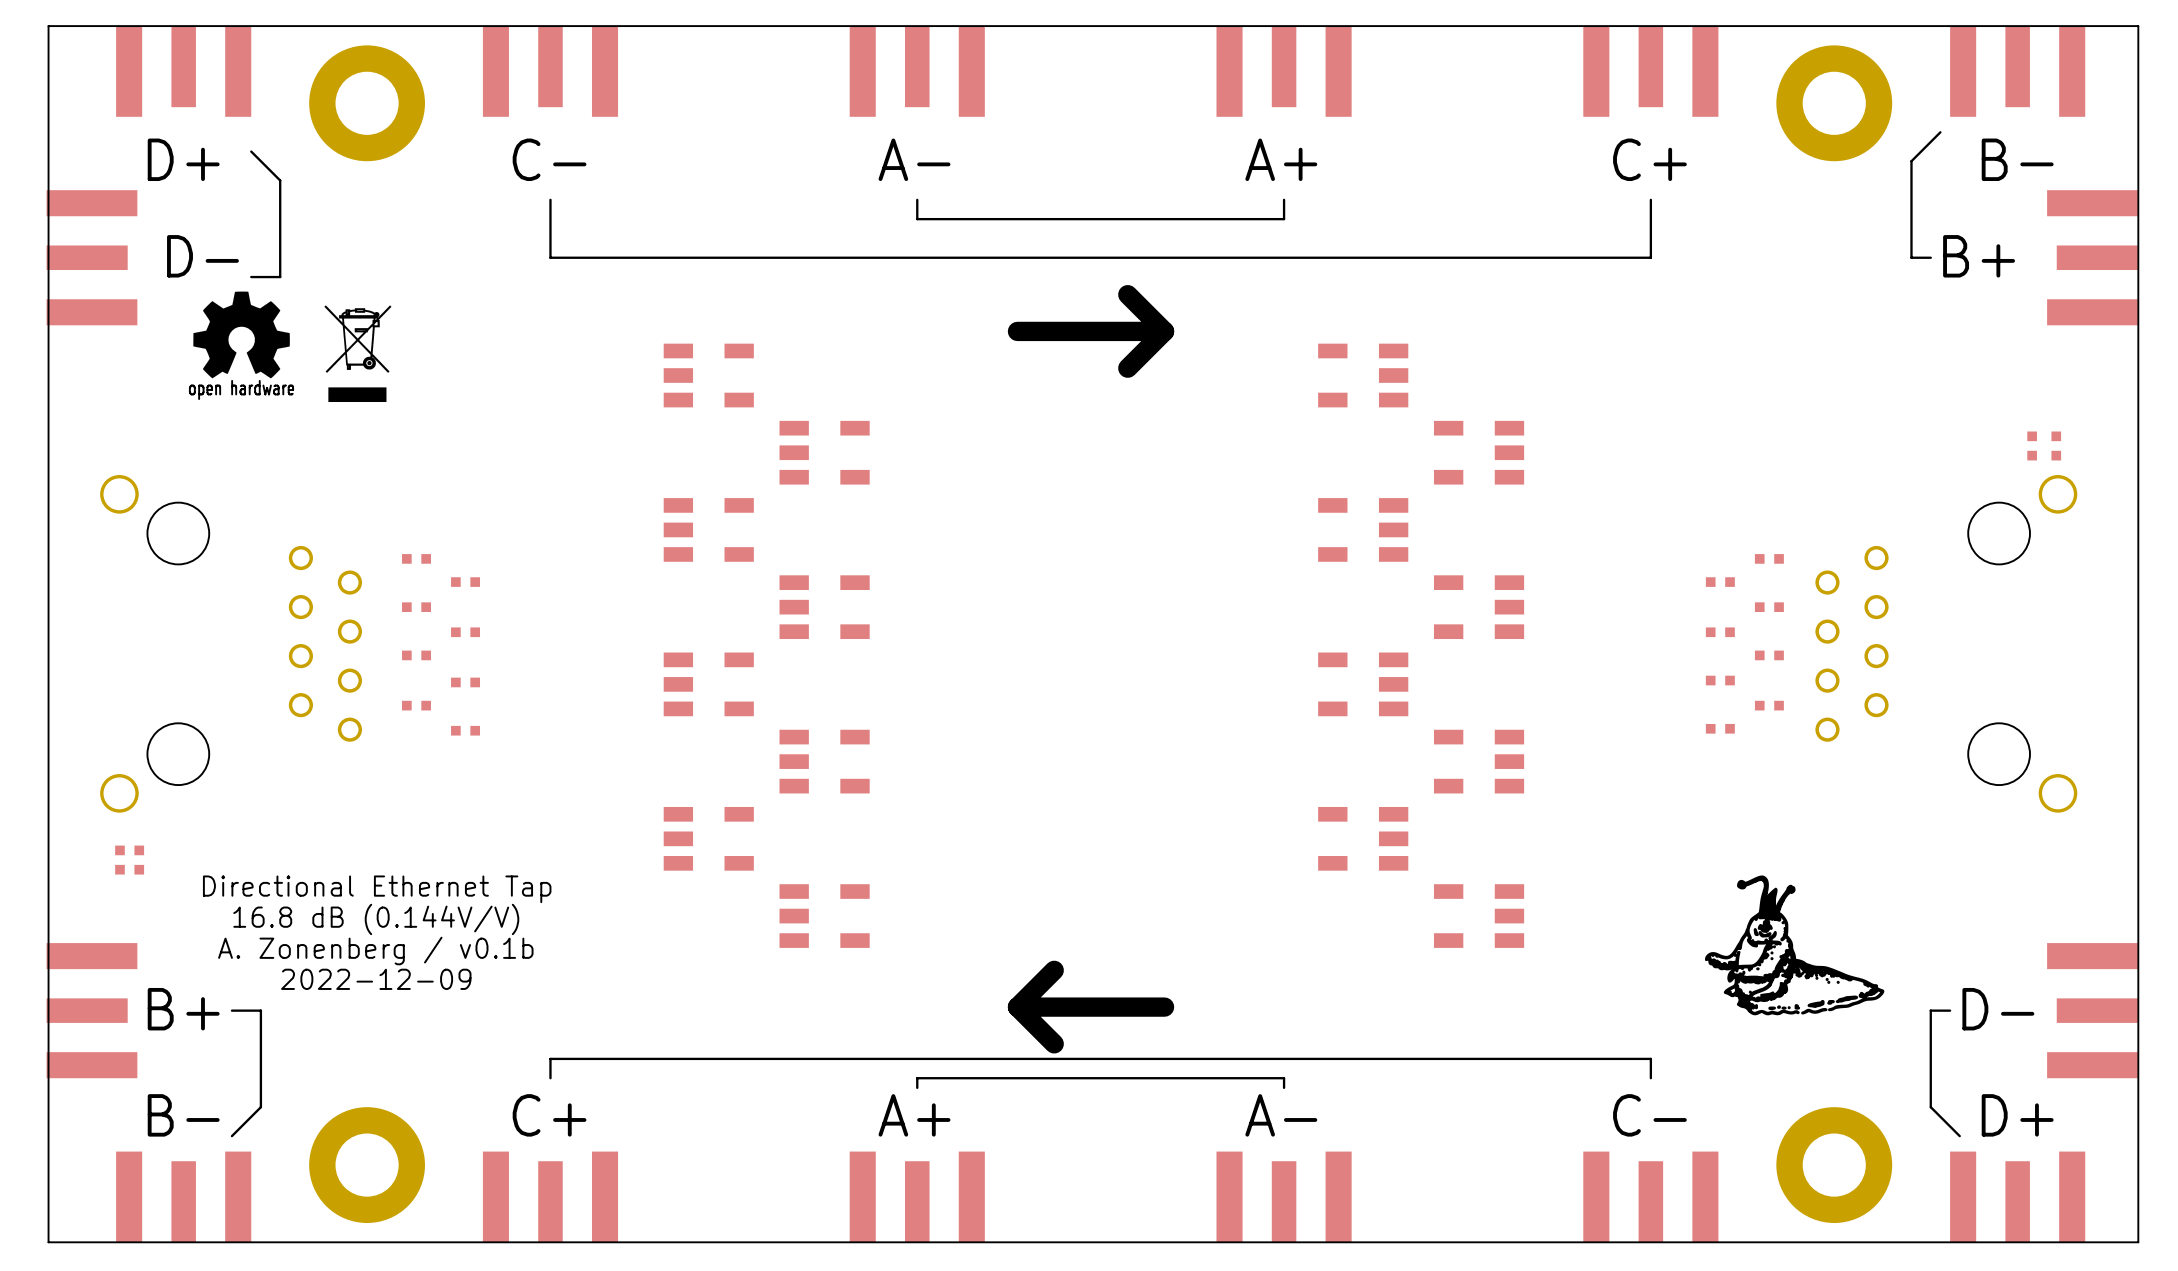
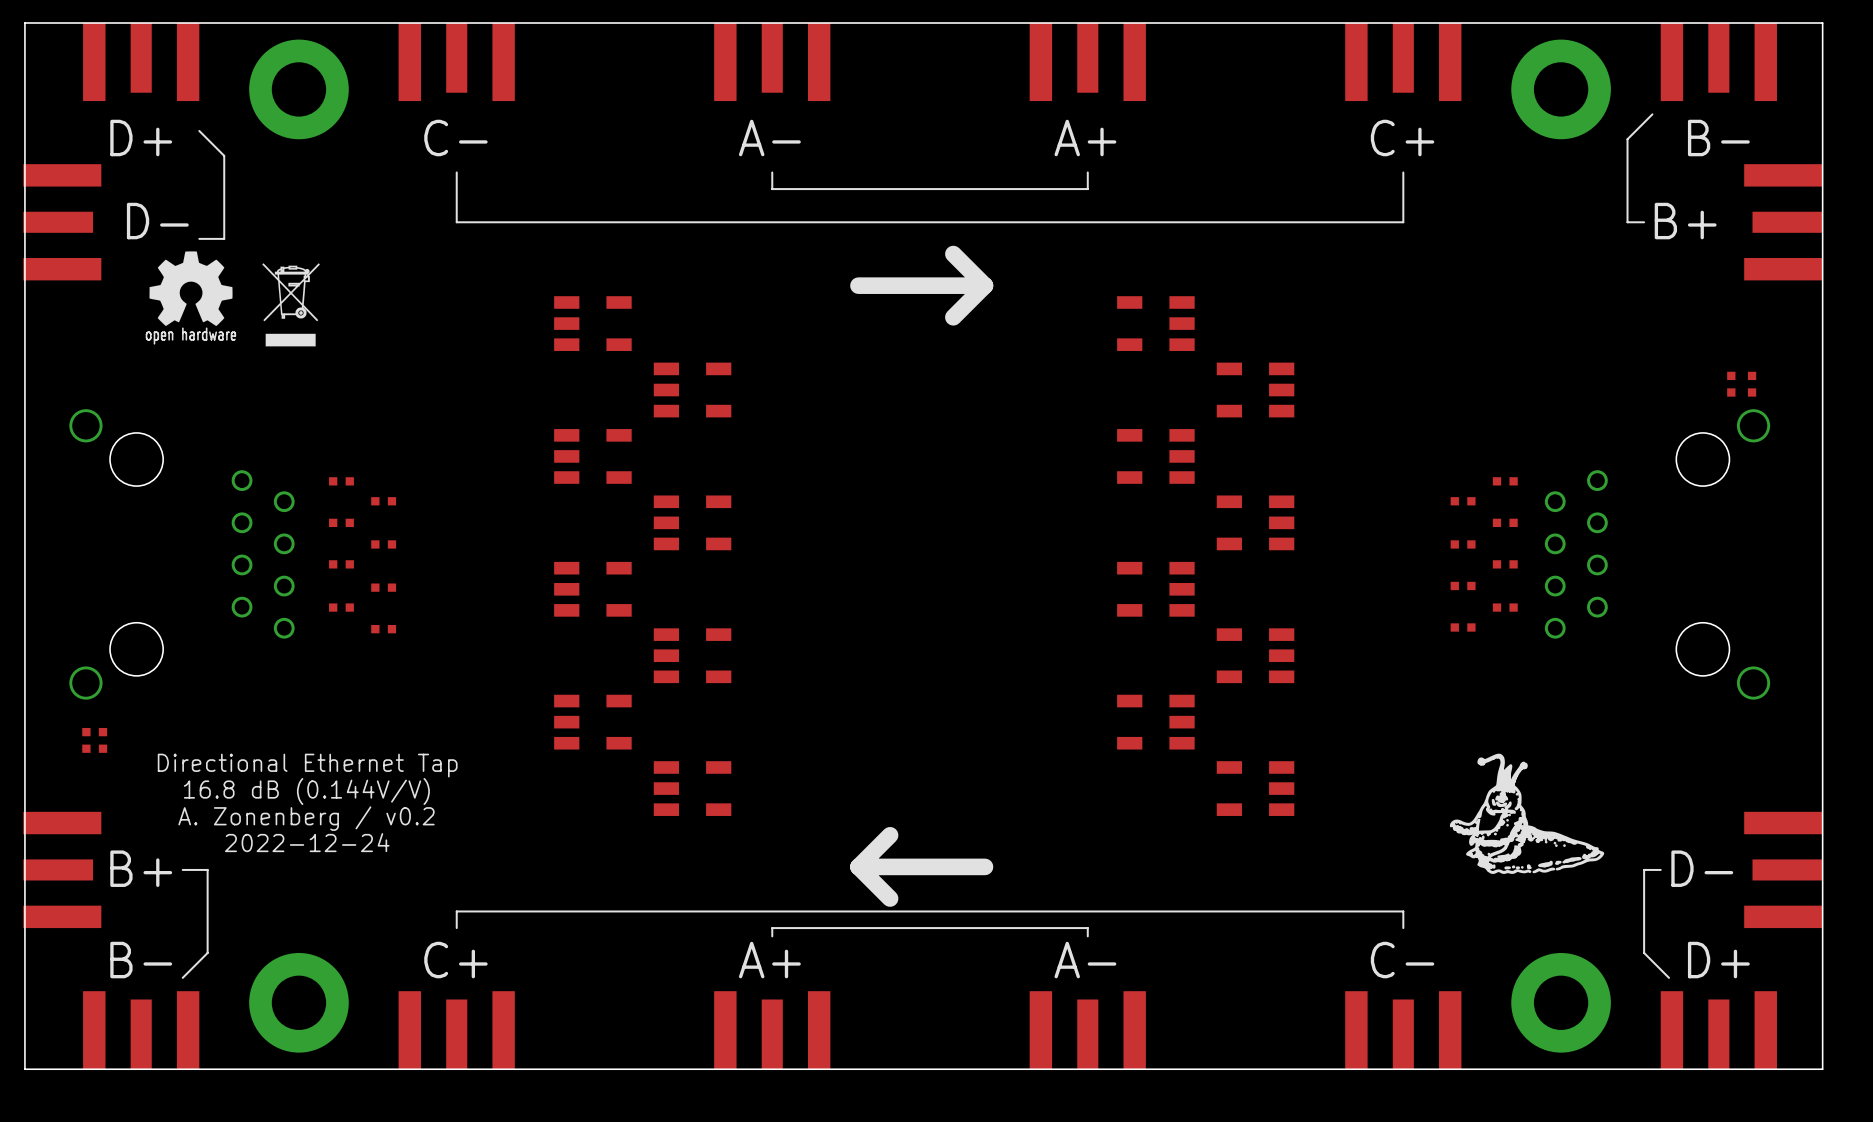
text: A. Zonenberg / v0.1b (375, 951) -> A. Zonenberg / v0.2 (306, 818)
text: 2022-12-09 (376, 979) -> 2022-12-24 (307, 842)

